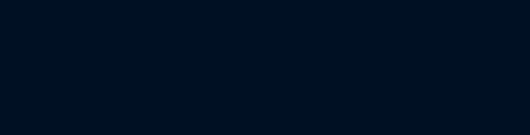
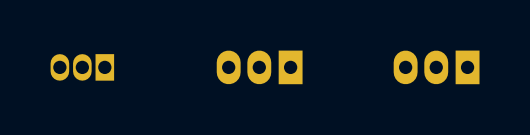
part: none -> (82, 67)
part: none -> (259, 67)
part: none -> (436, 67)

